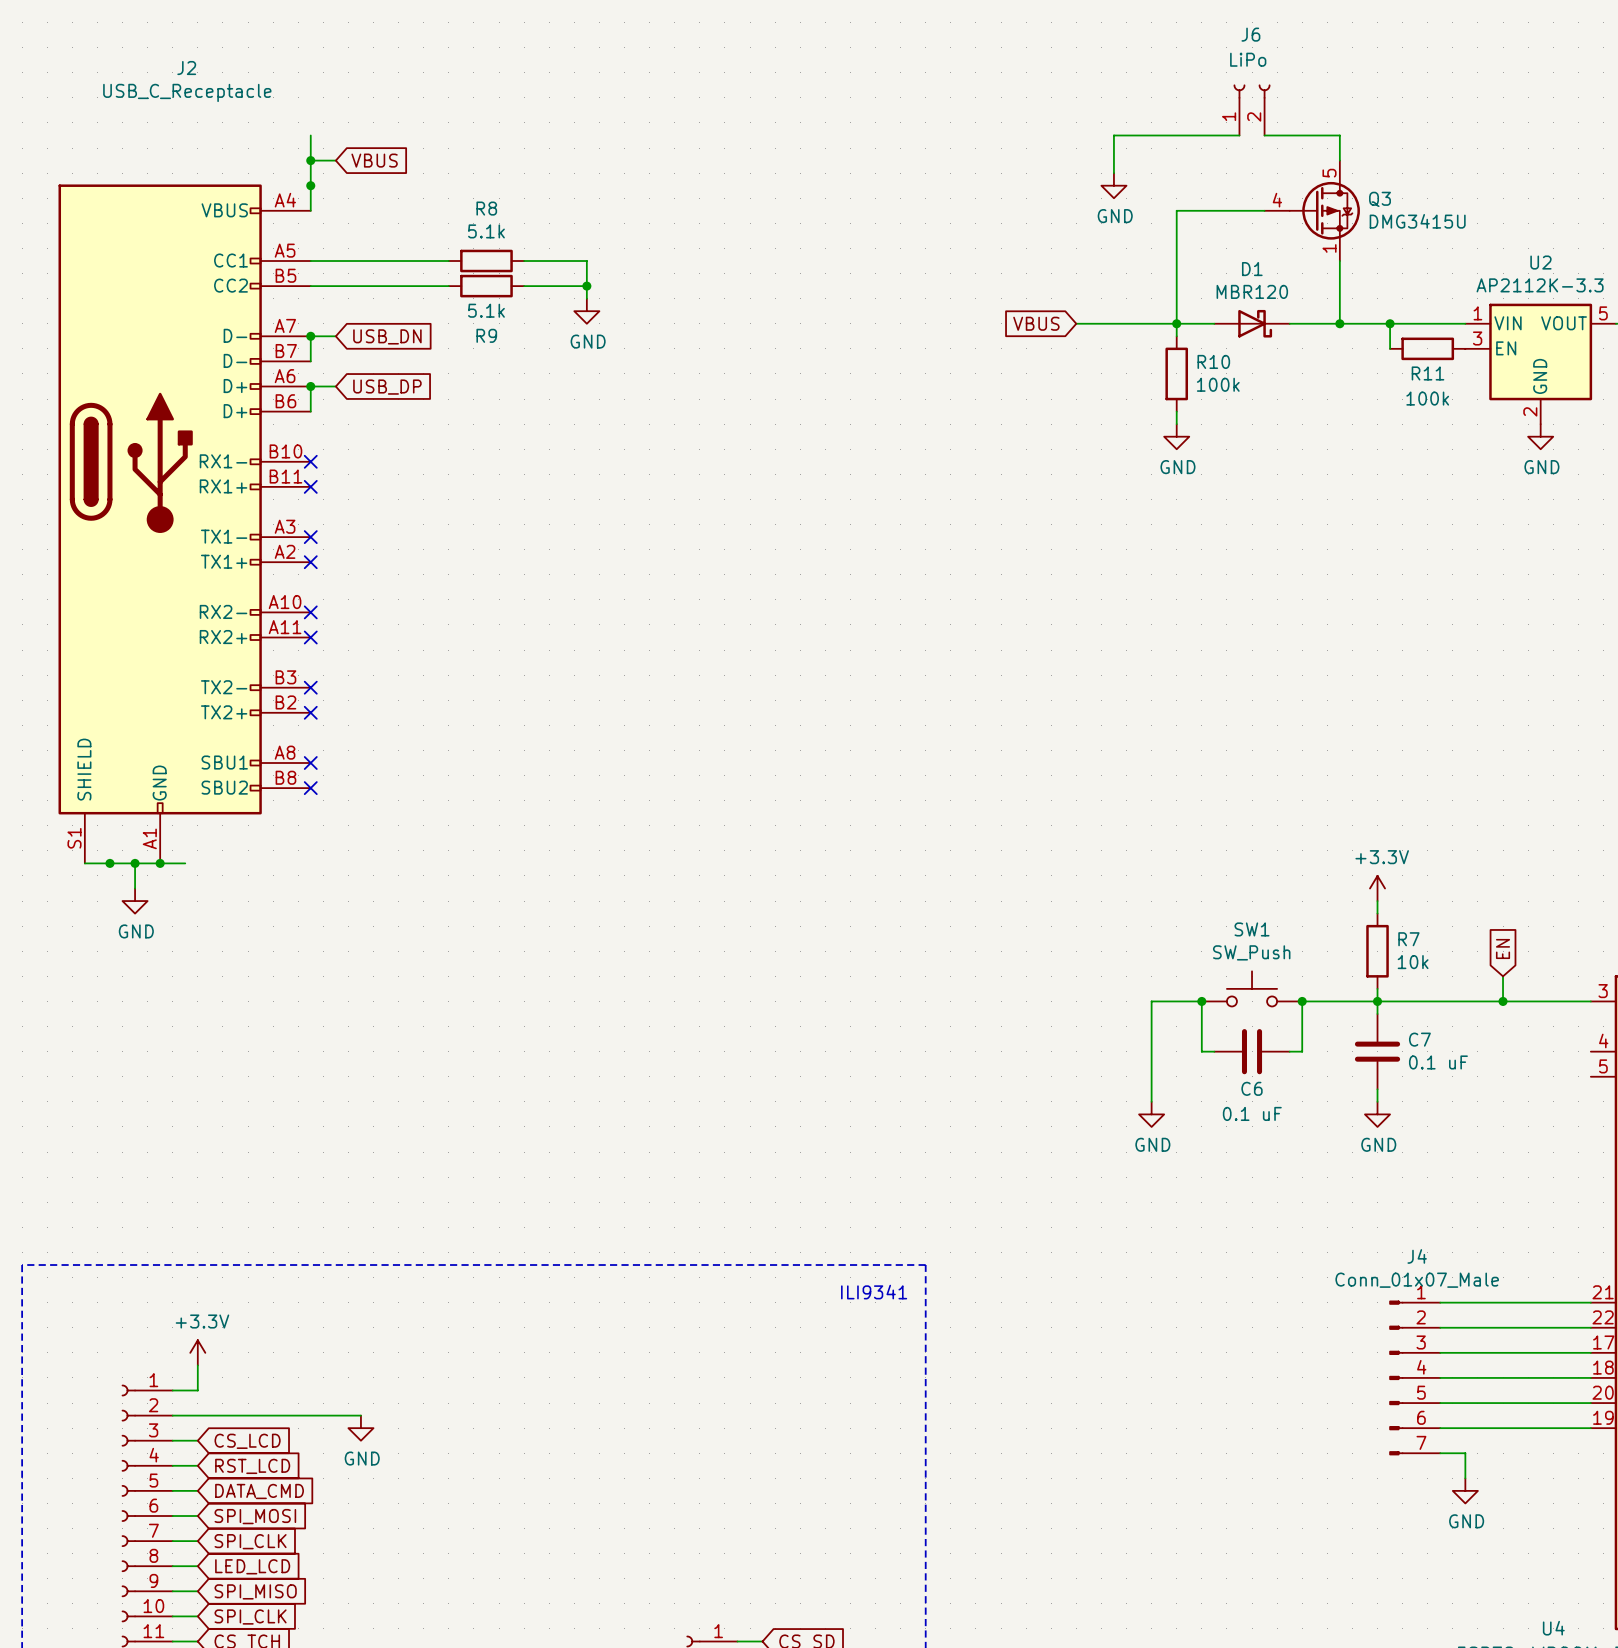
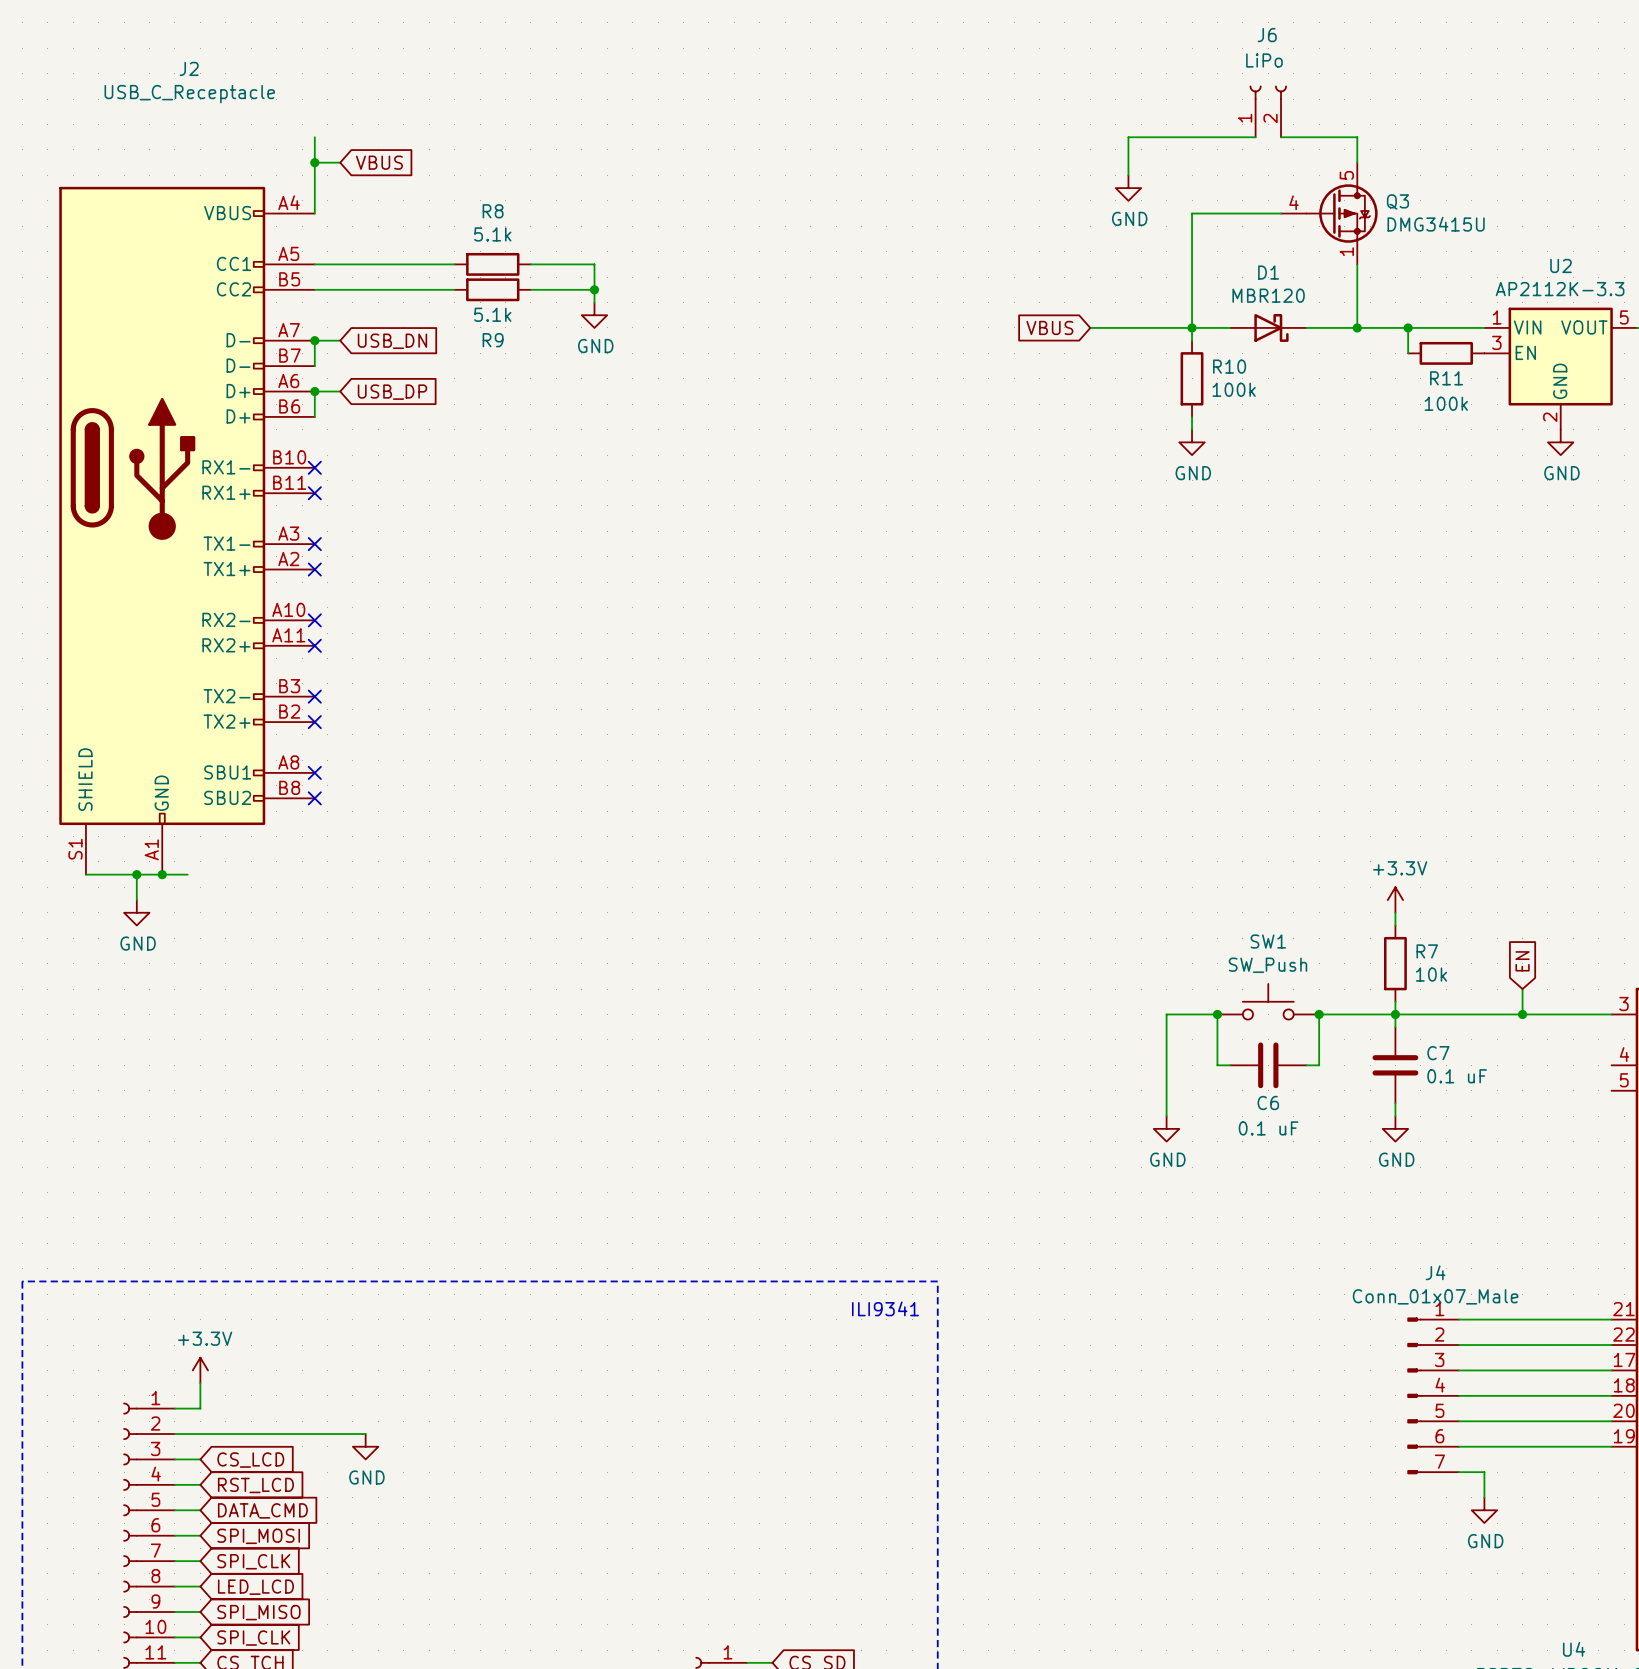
junction: (310, 185) -> none
junction: (109, 863) -> none

